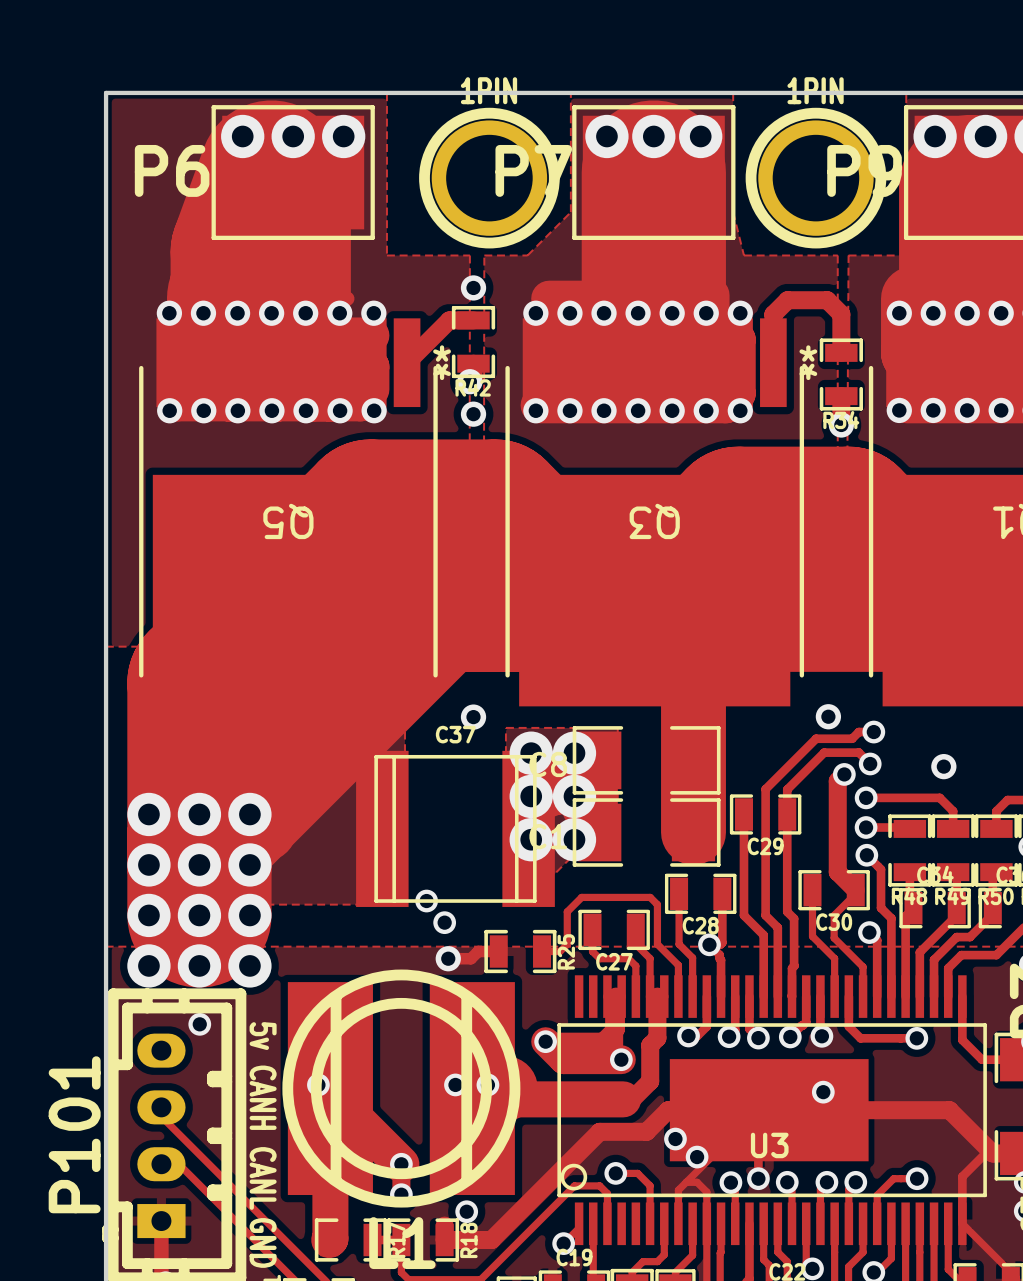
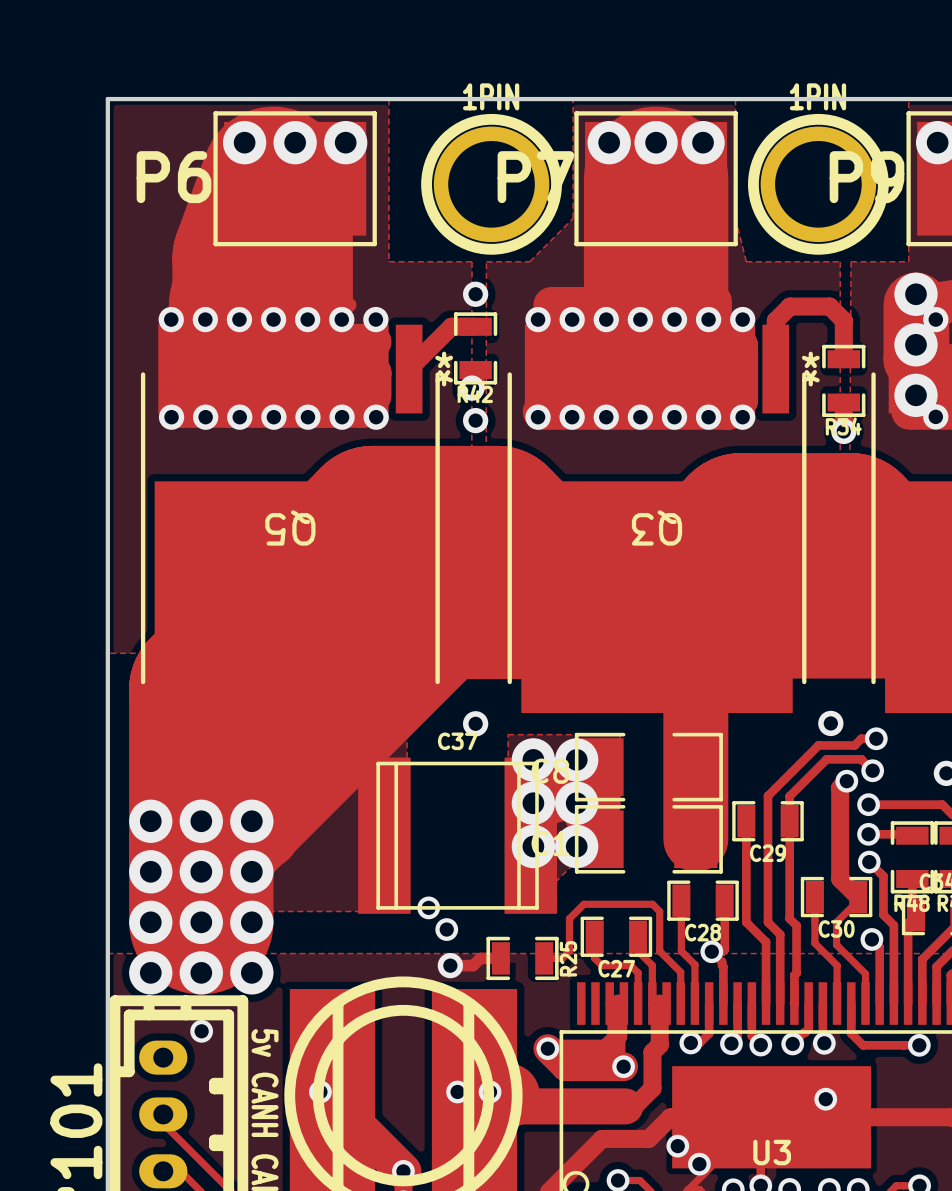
via: none -> (915, 294)
via: (899, 313) -> none
via: none -> (915, 344)
via size: [886, 397, 912, 424] -> [894, 373, 938, 417]

